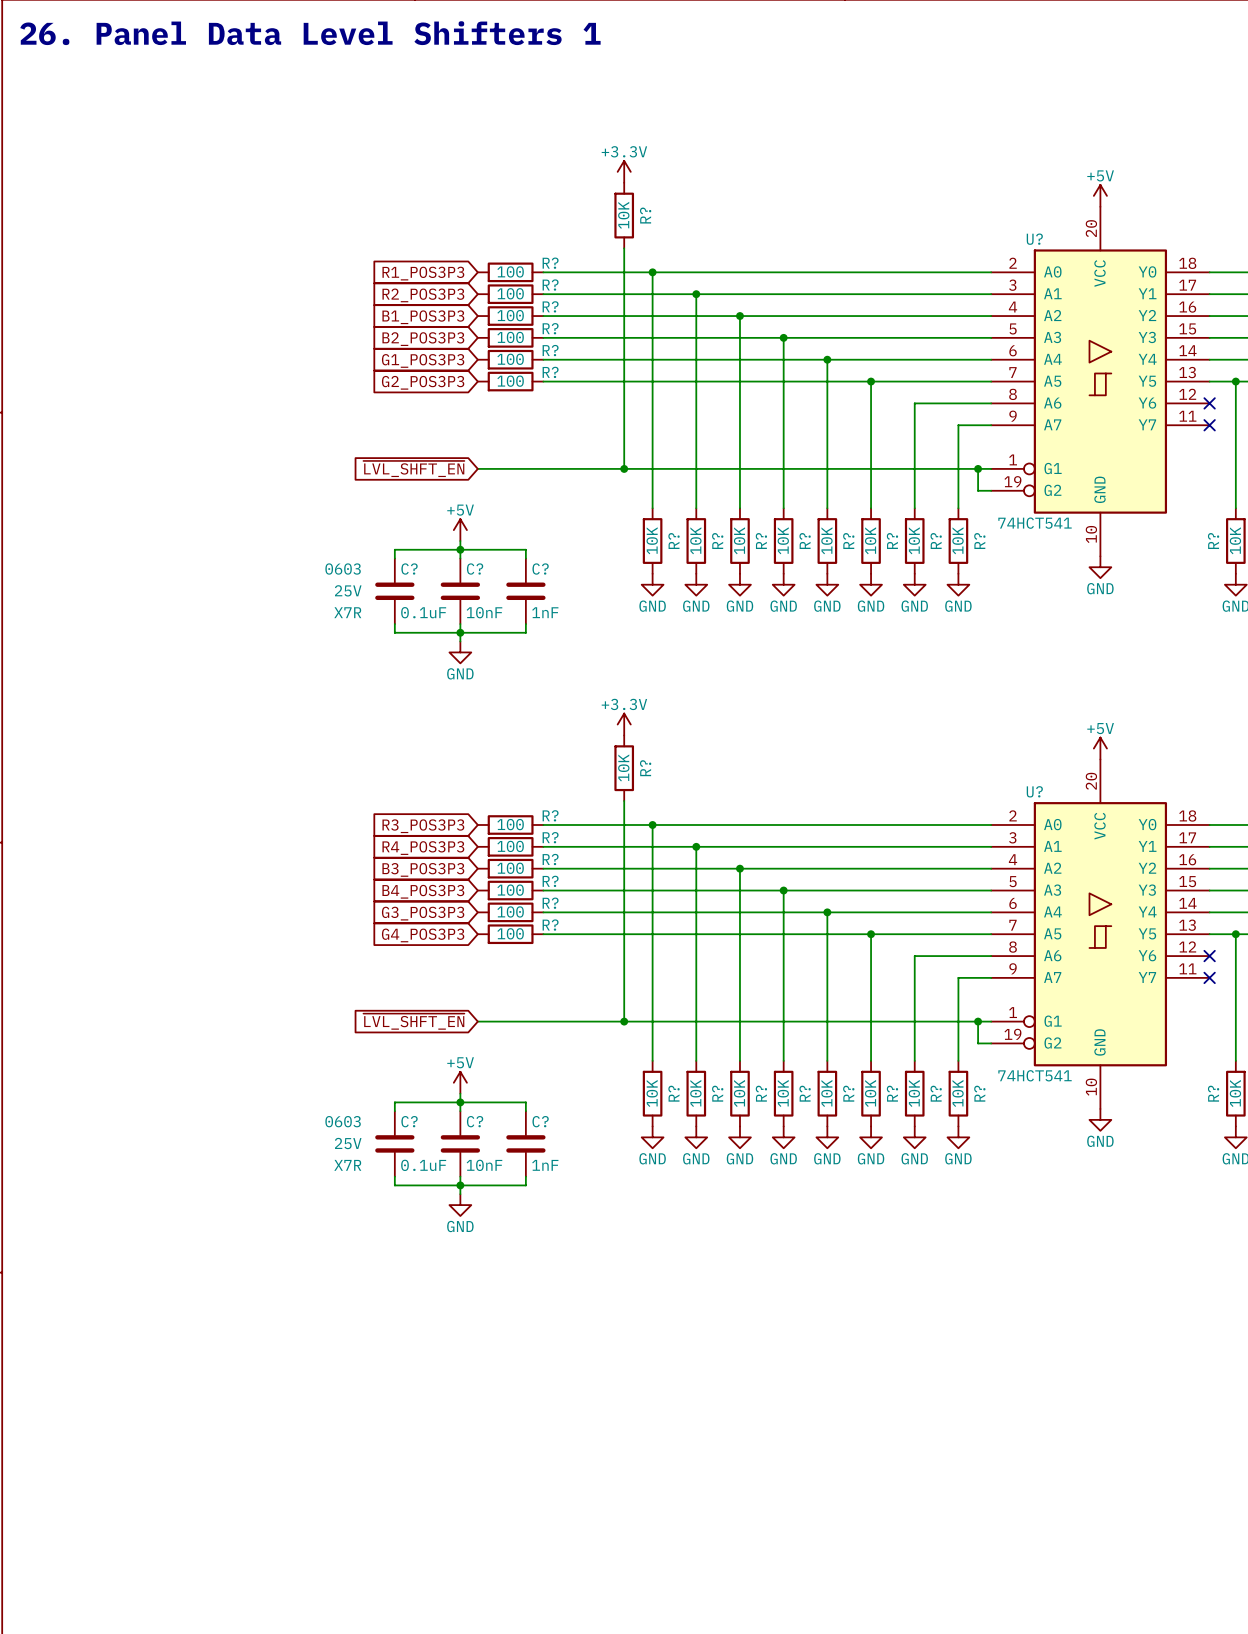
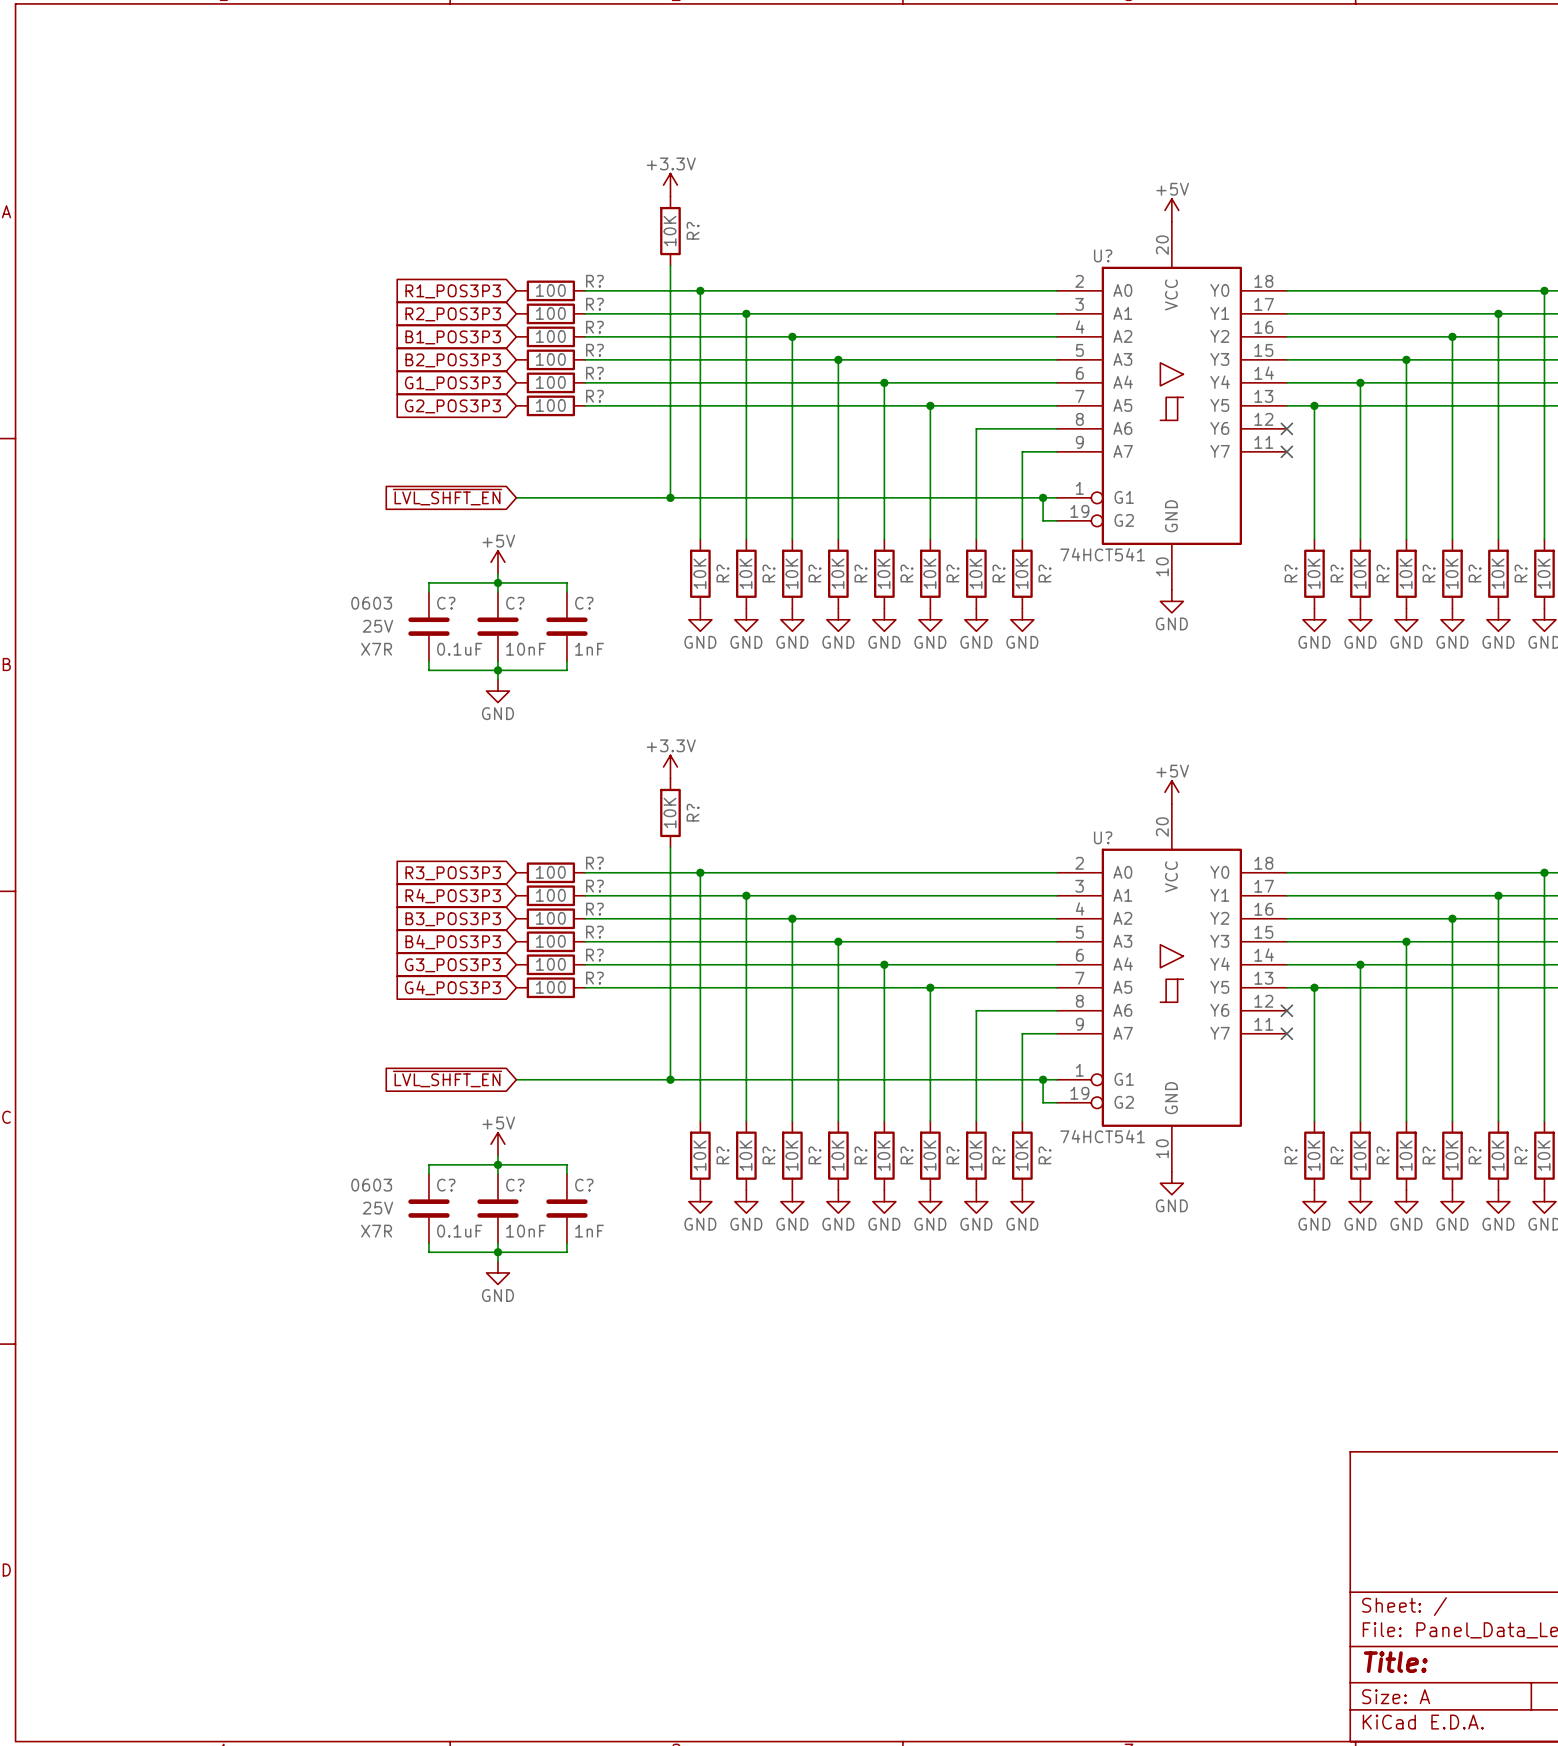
text: 26. Panel Data Level Shifters 1 (310, 33) -> none

